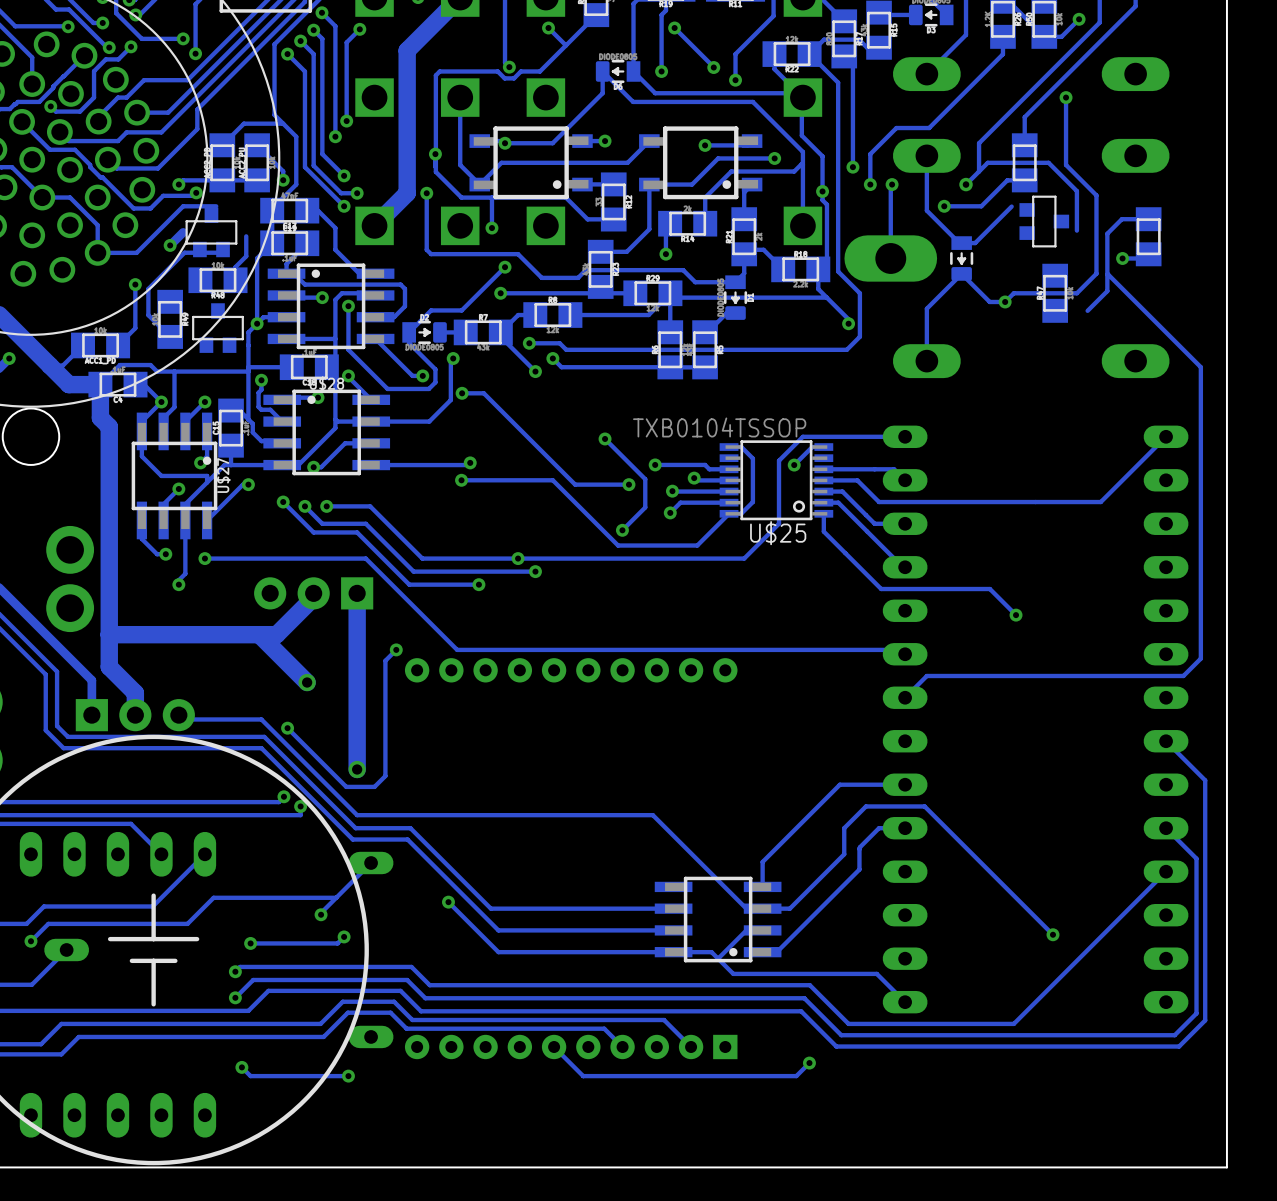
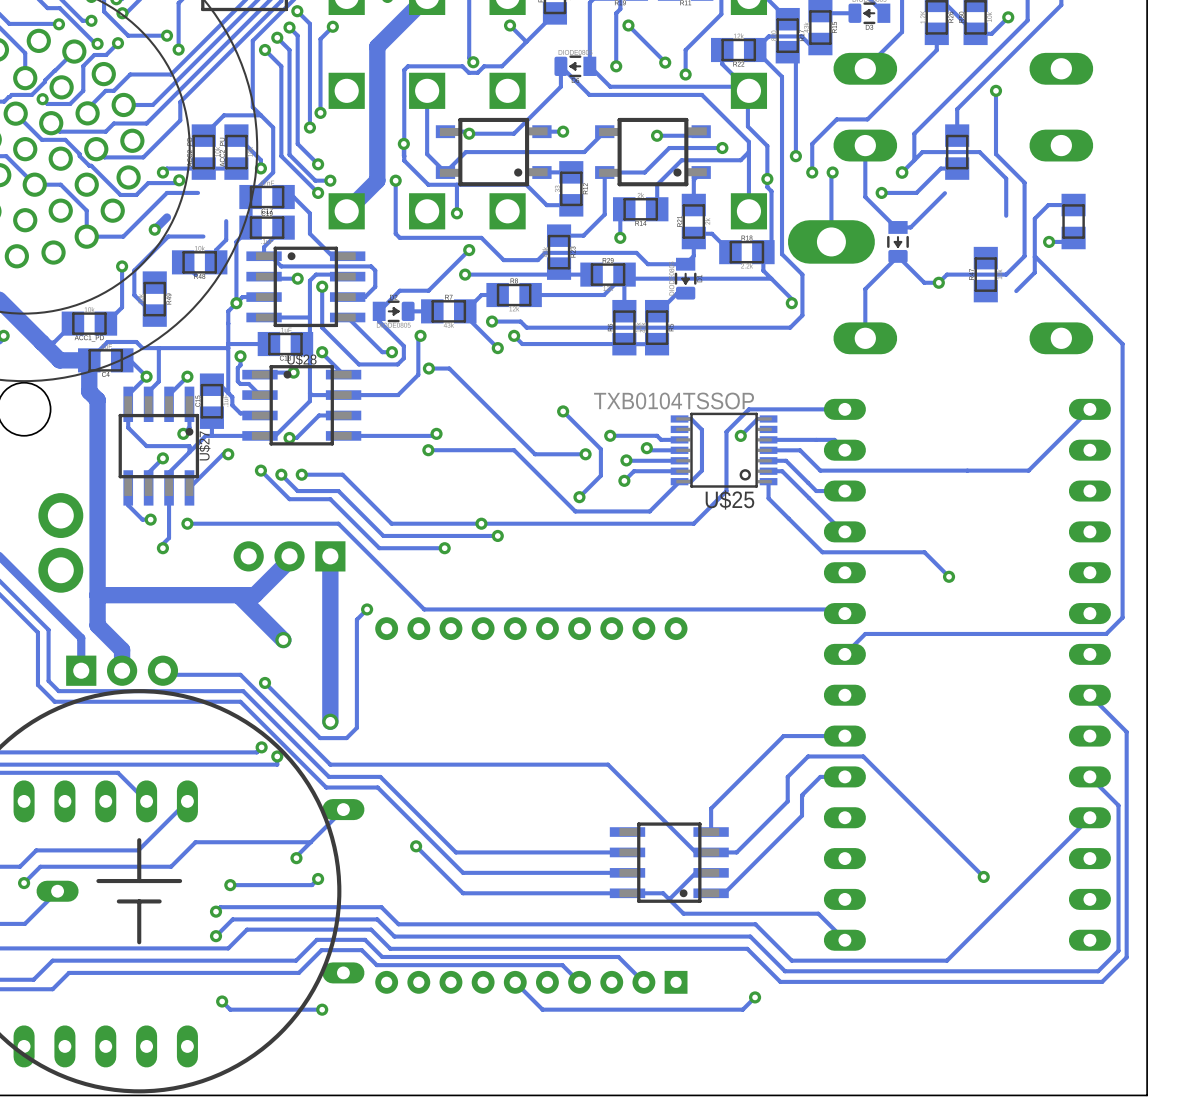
part: (1044, 221) -> none
part: (211, 232) -> none
part: (217, 328) -> none

